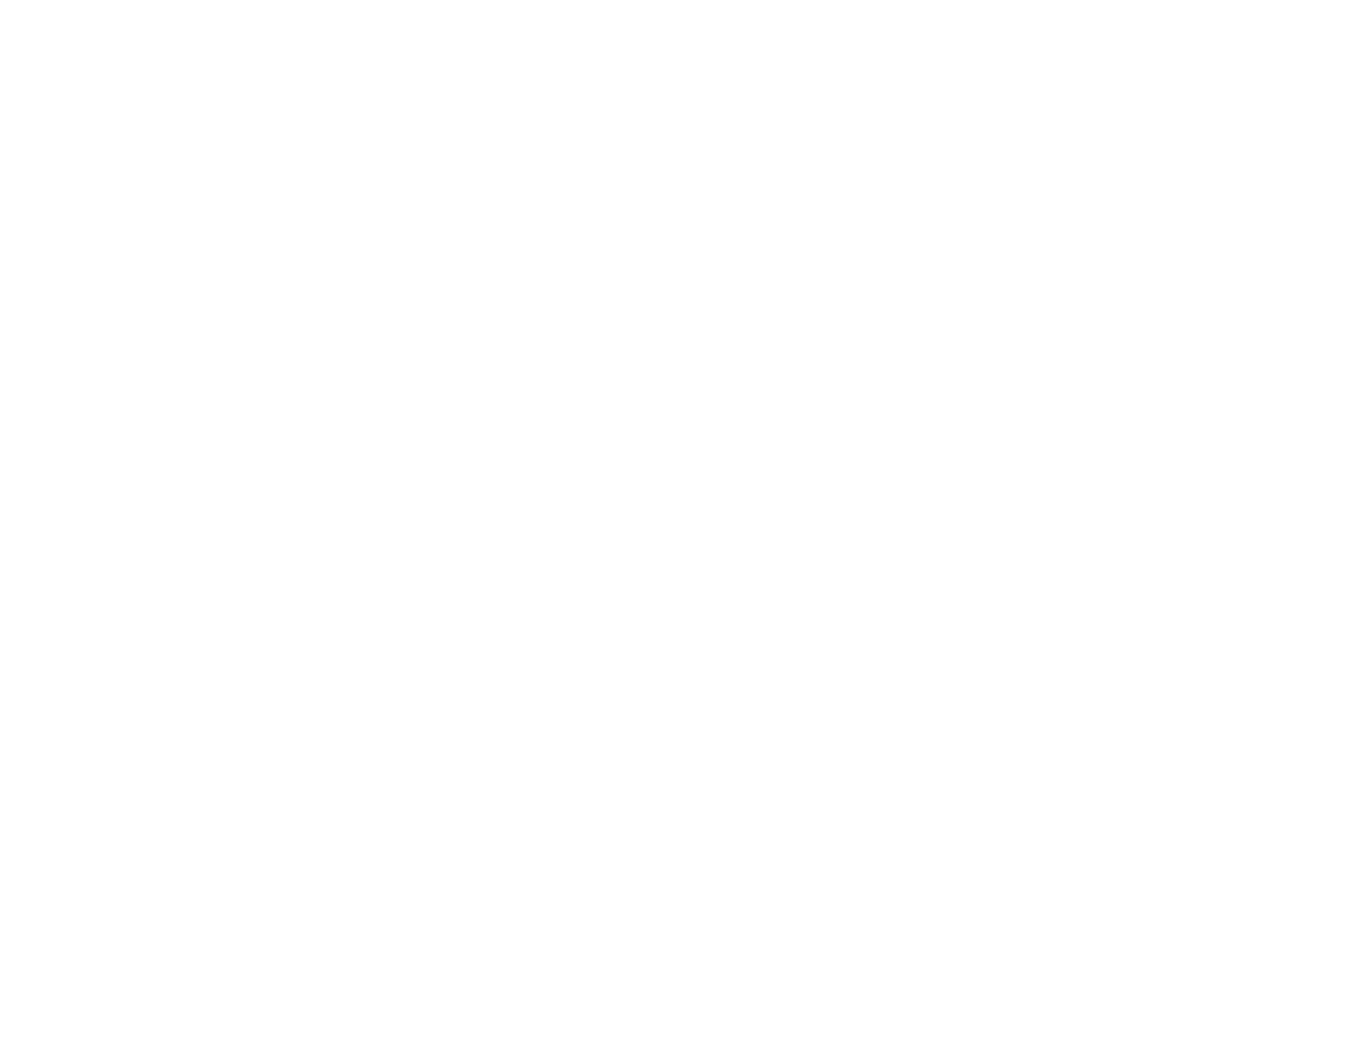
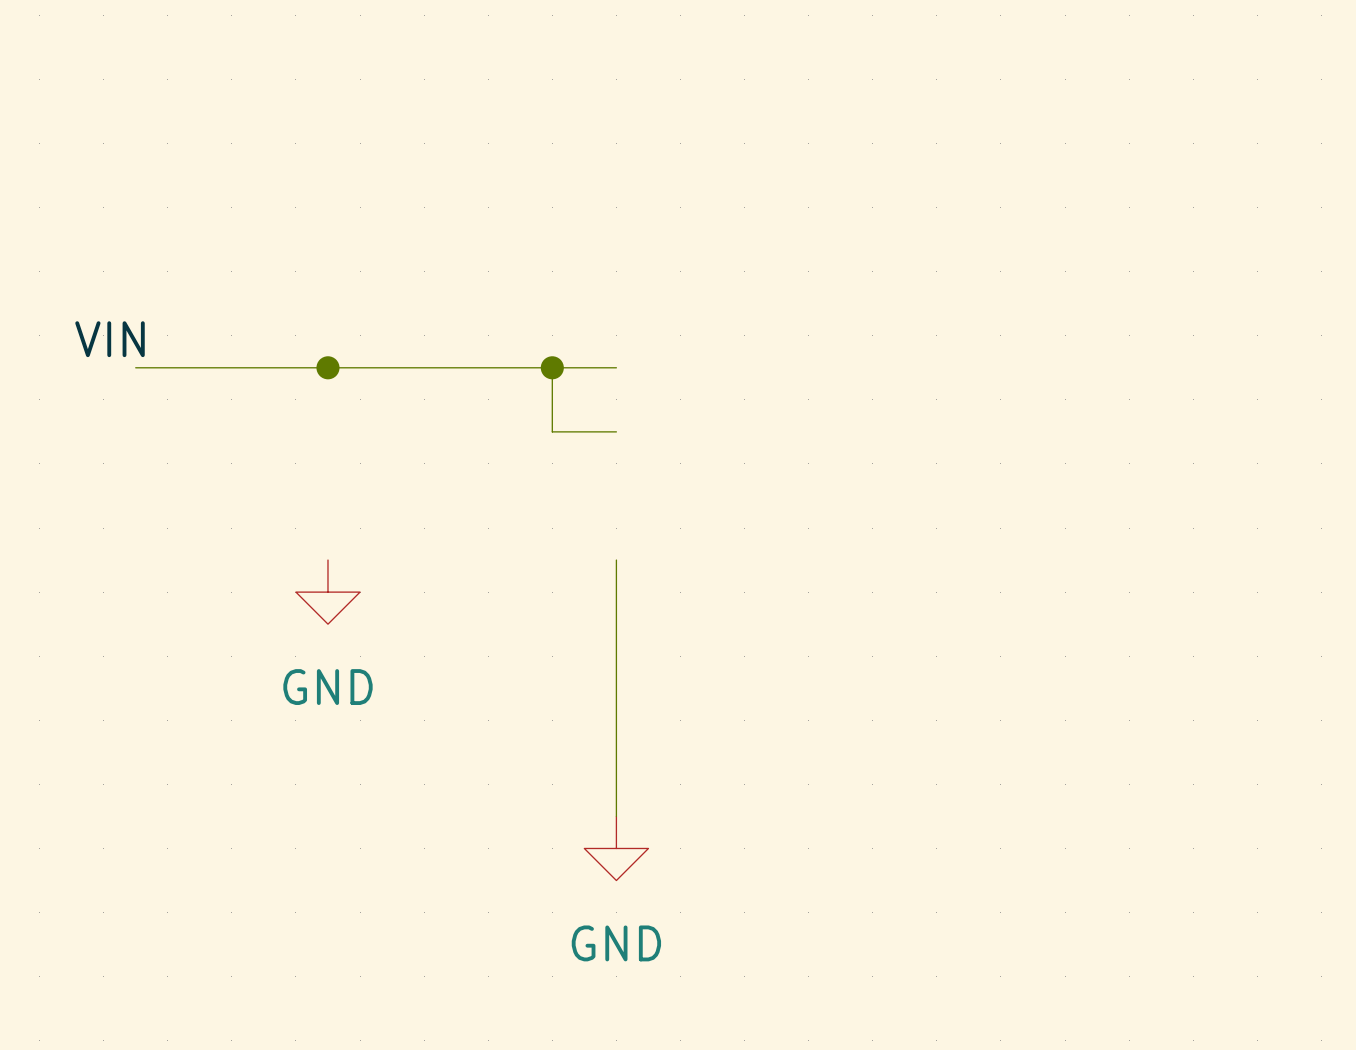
label: none -> VIN (110, 339)
wire: none -> (135, 367) (616, 367)
junction: none -> (327, 367)
wire: none -> (552, 367) (552, 431) (616, 431)
junction: none -> (552, 367)
wire: none -> (616, 560) (616, 816)
power symbol: none -> GND (327, 592)
power symbol: none -> GND (616, 848)

